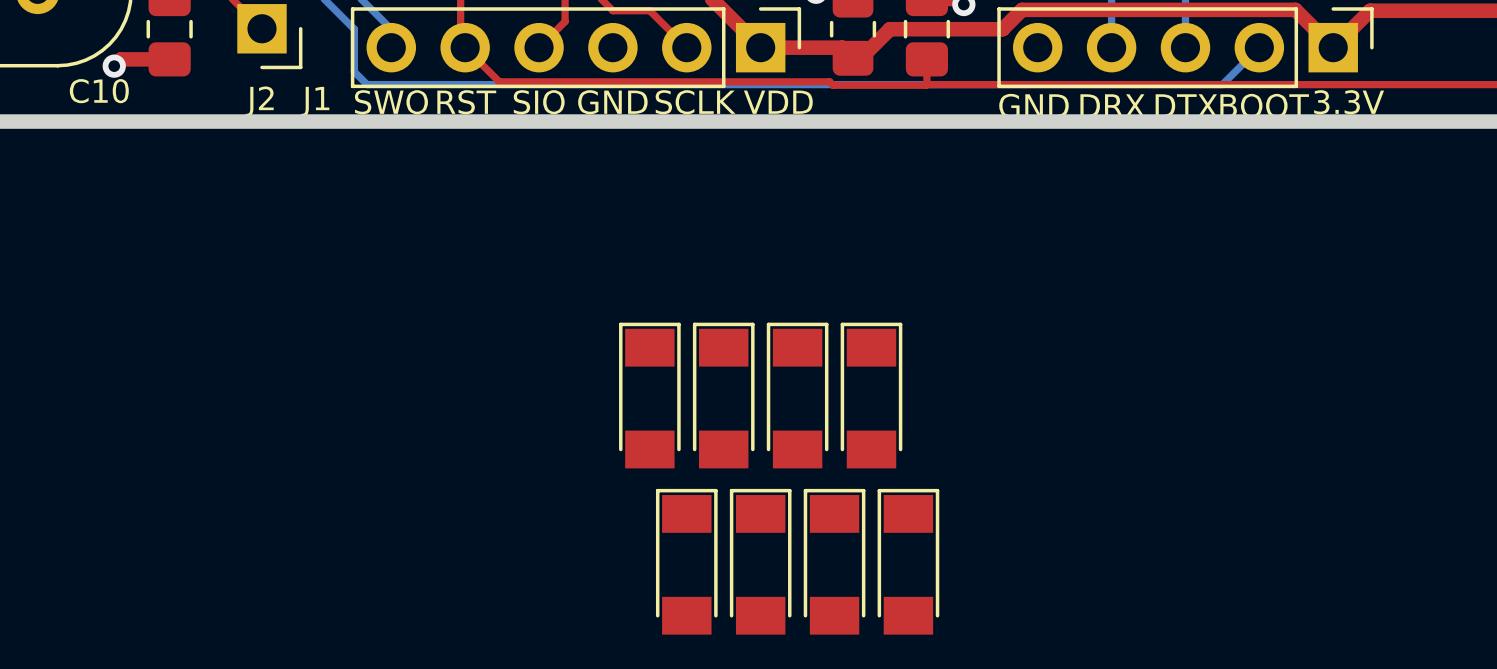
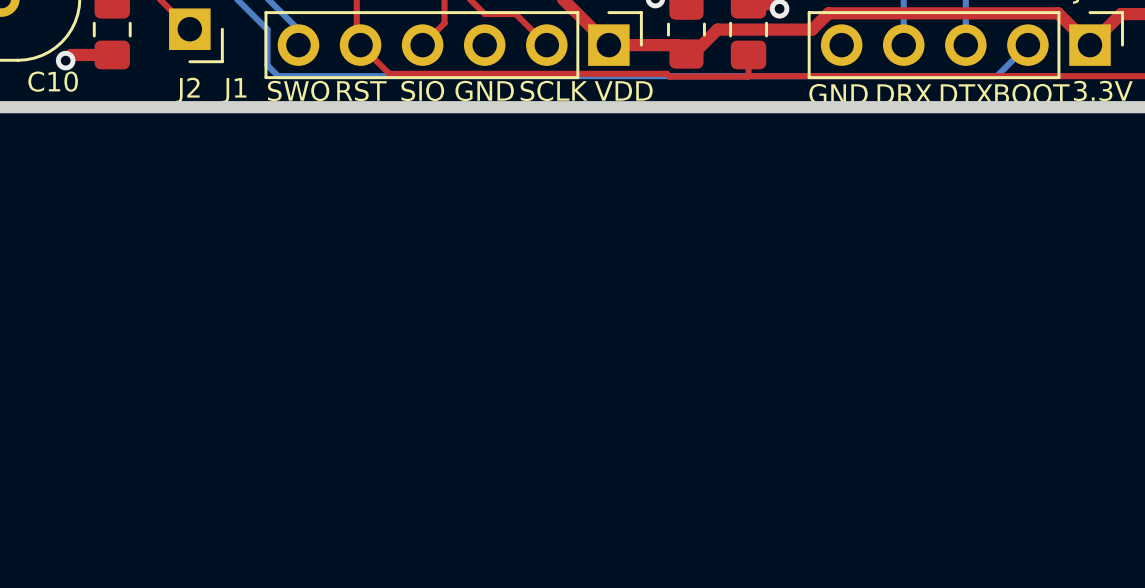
part: (649, 395) -> none
part: (723, 395) -> none
part: (797, 395) -> none
part: (871, 395) -> none
part: (686, 561) -> none
part: (760, 561) -> none
part: (834, 561) -> none
part: (908, 561) -> none

